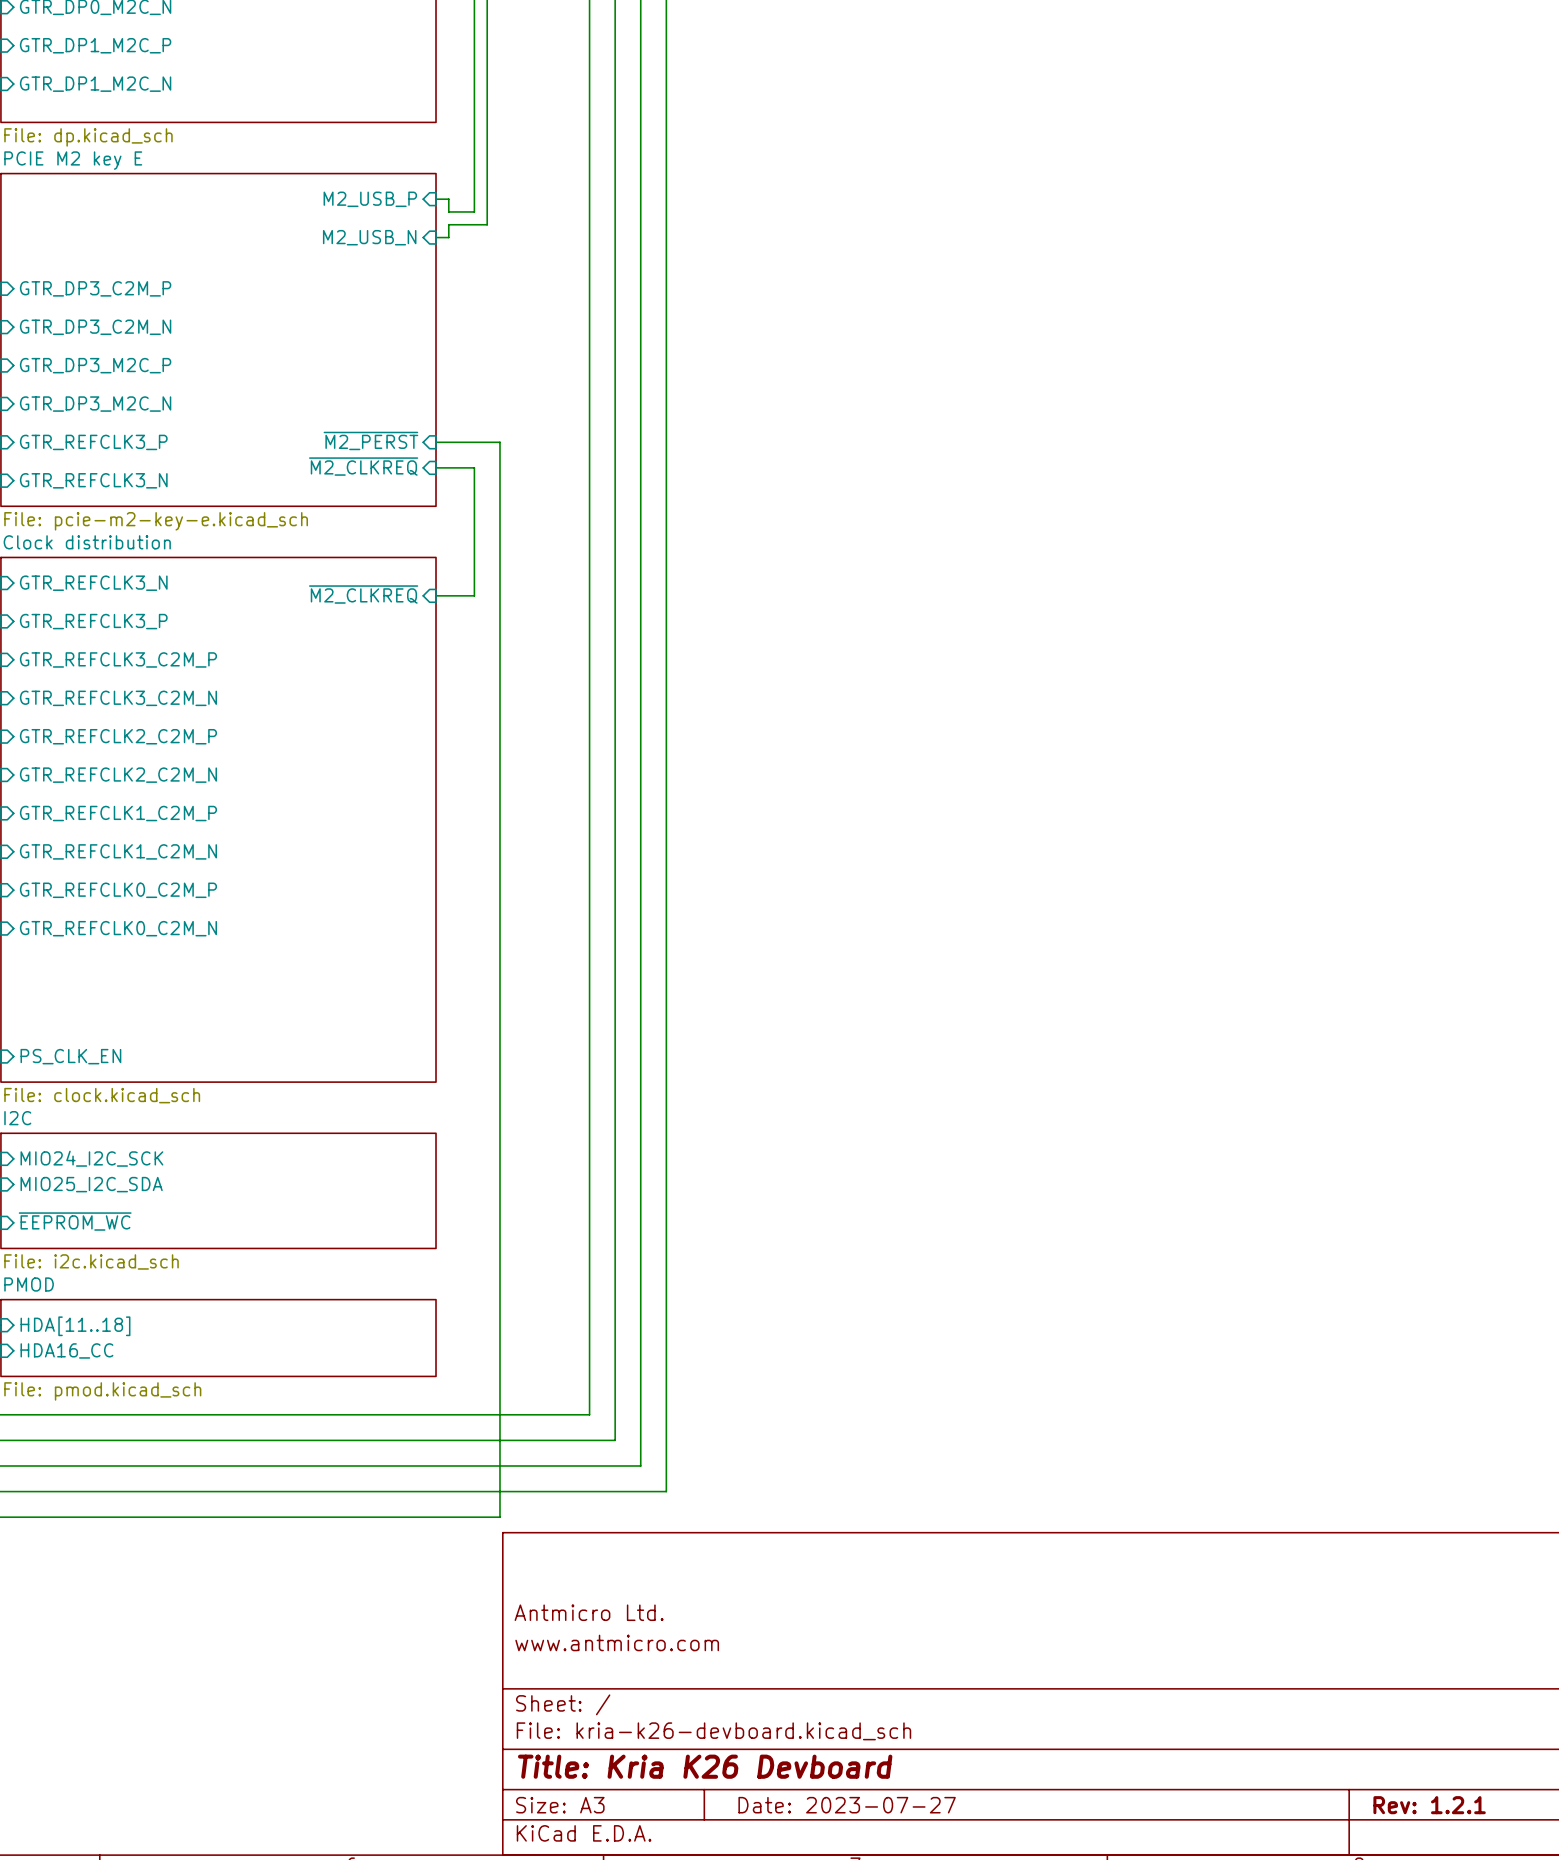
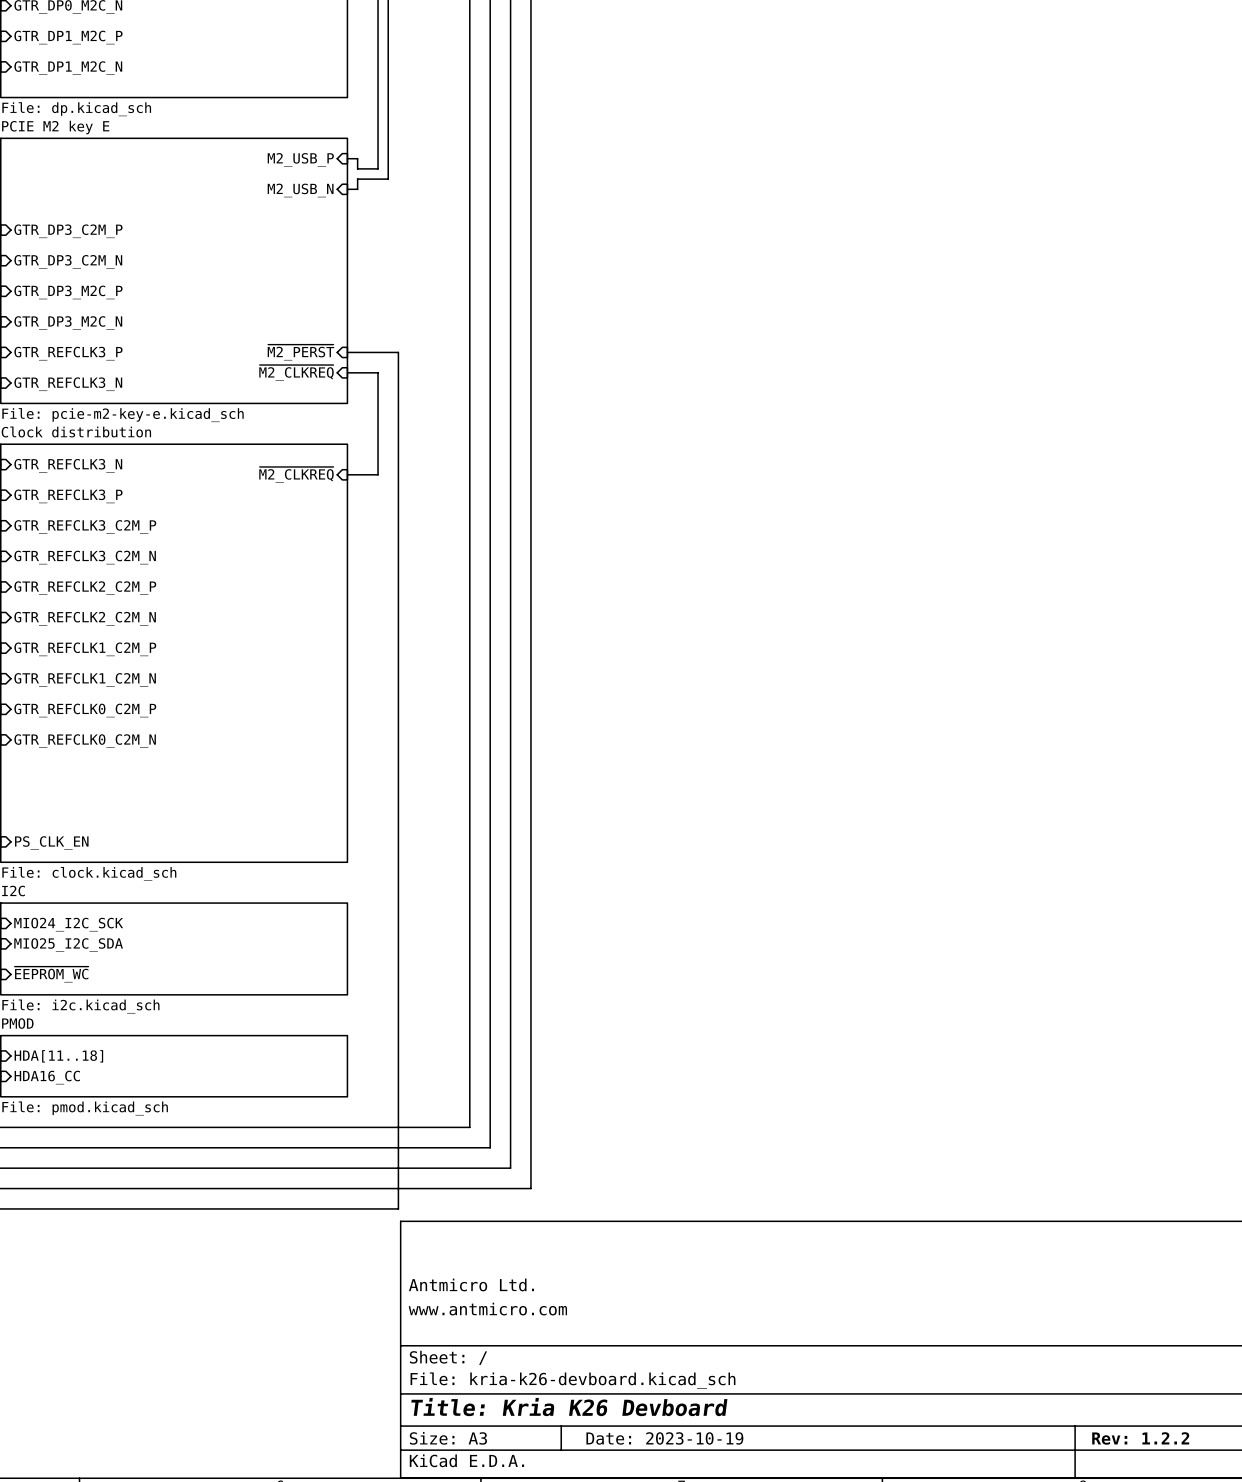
title block: Date: 2023-07-27 (847, 1805) -> Date: 2023-10-19 (664, 1438)
title block: Rev: 1.2.1 (1429, 1805) -> Rev: 1.2.2 (1140, 1438)

